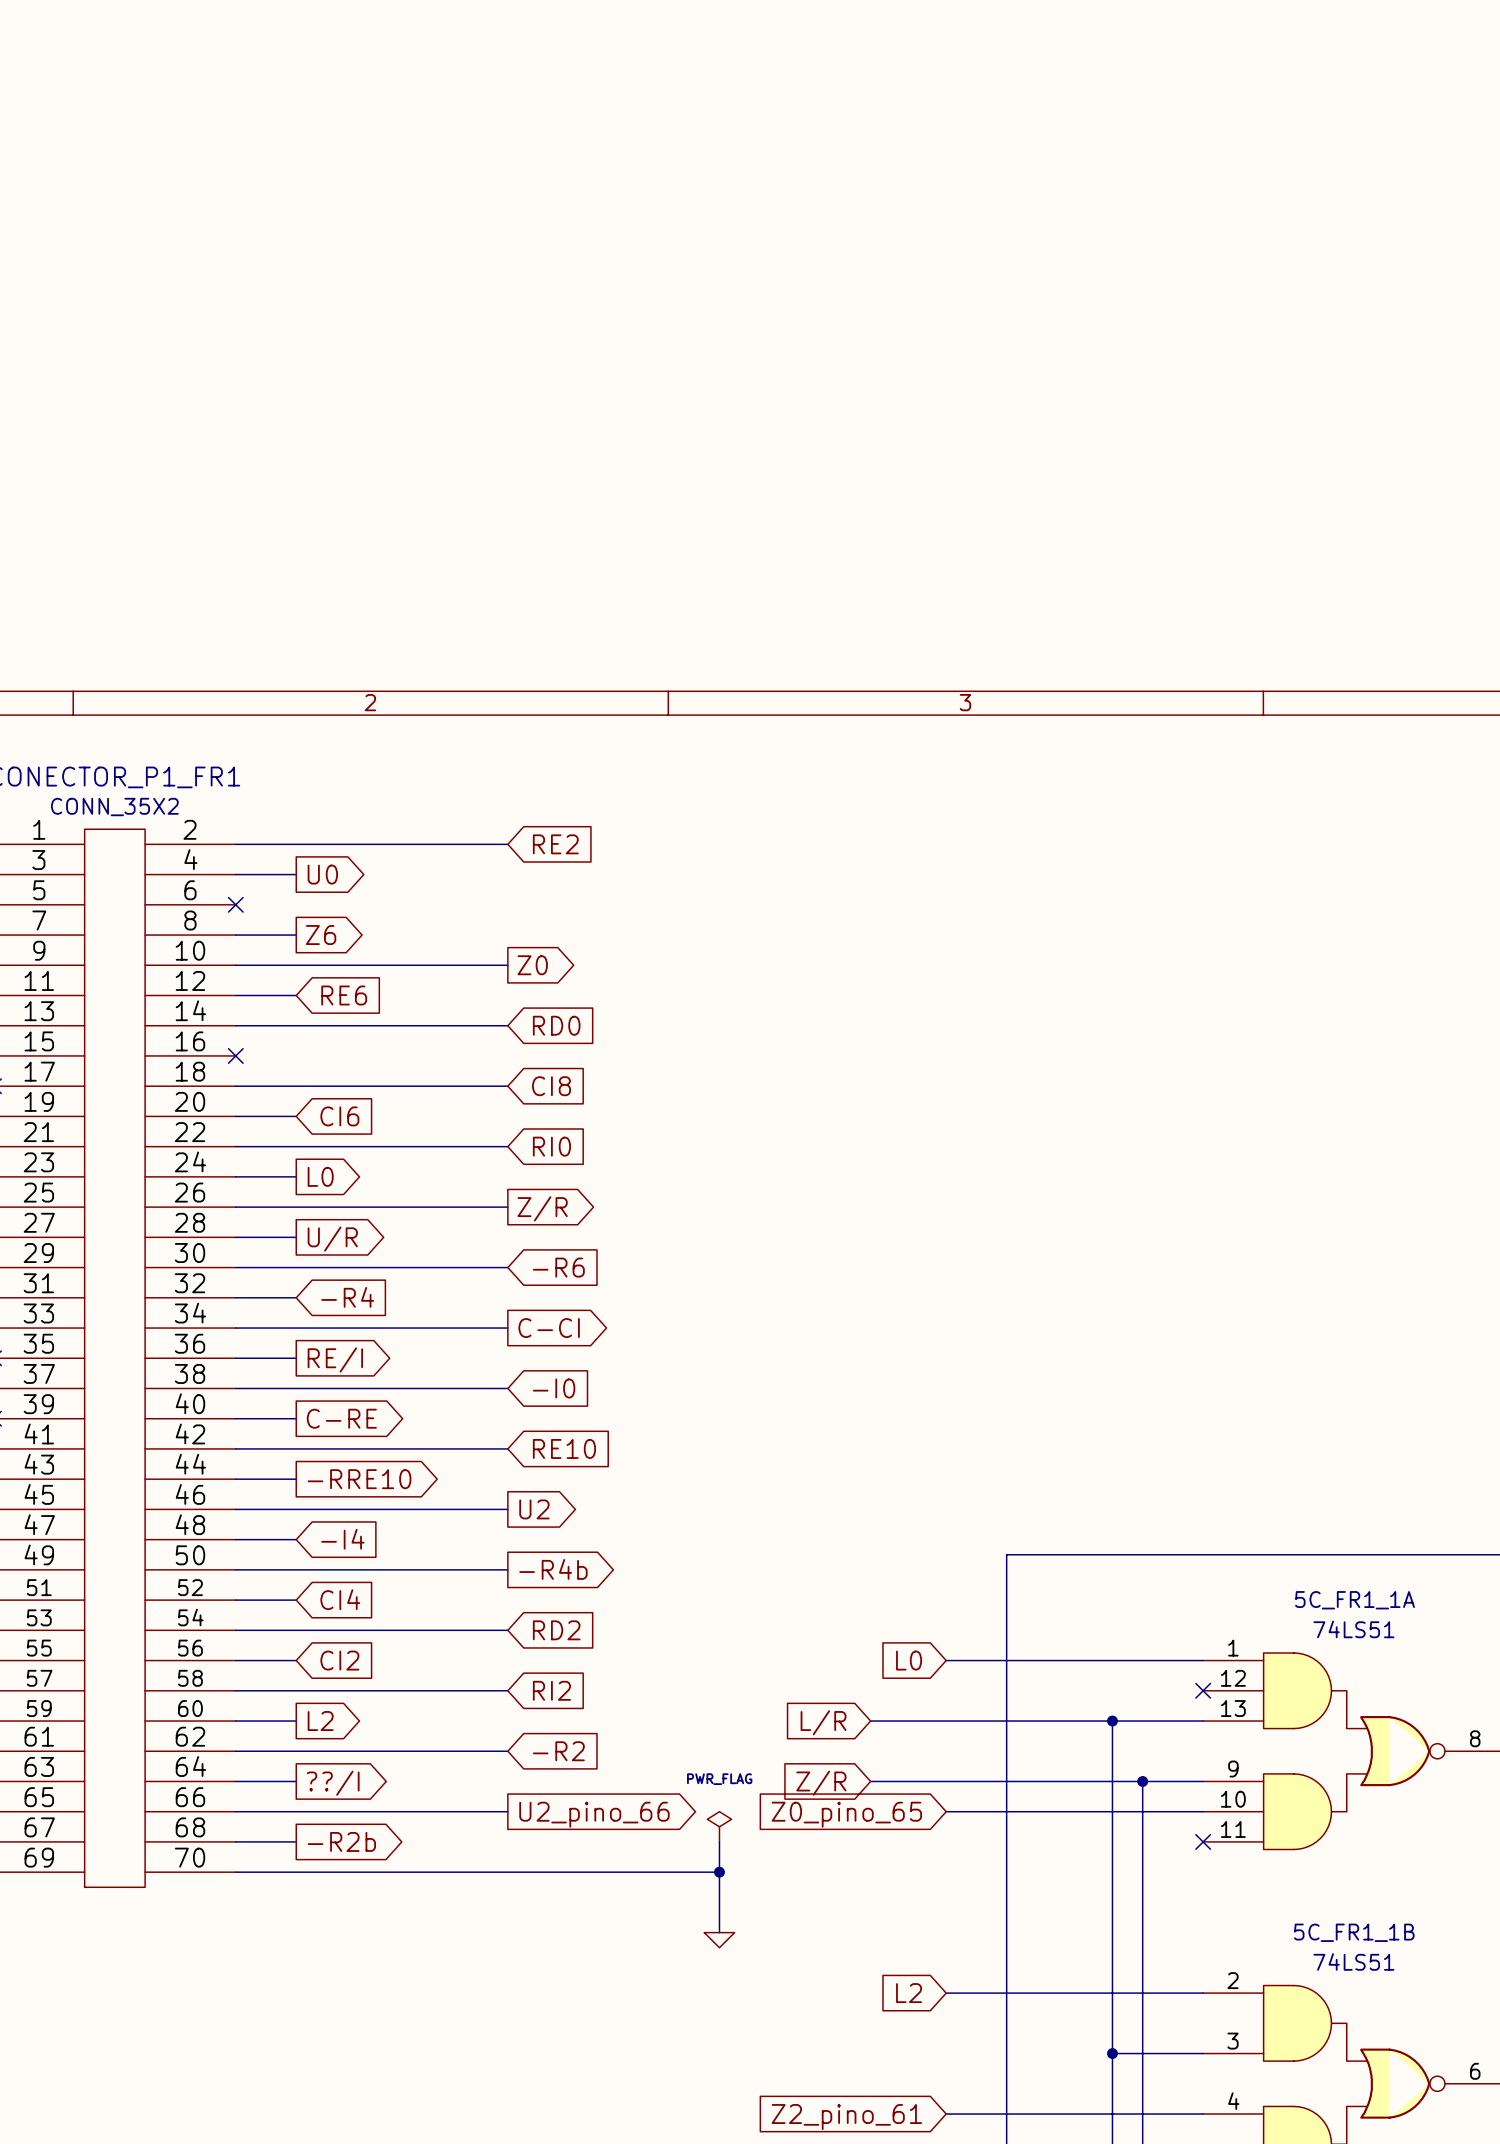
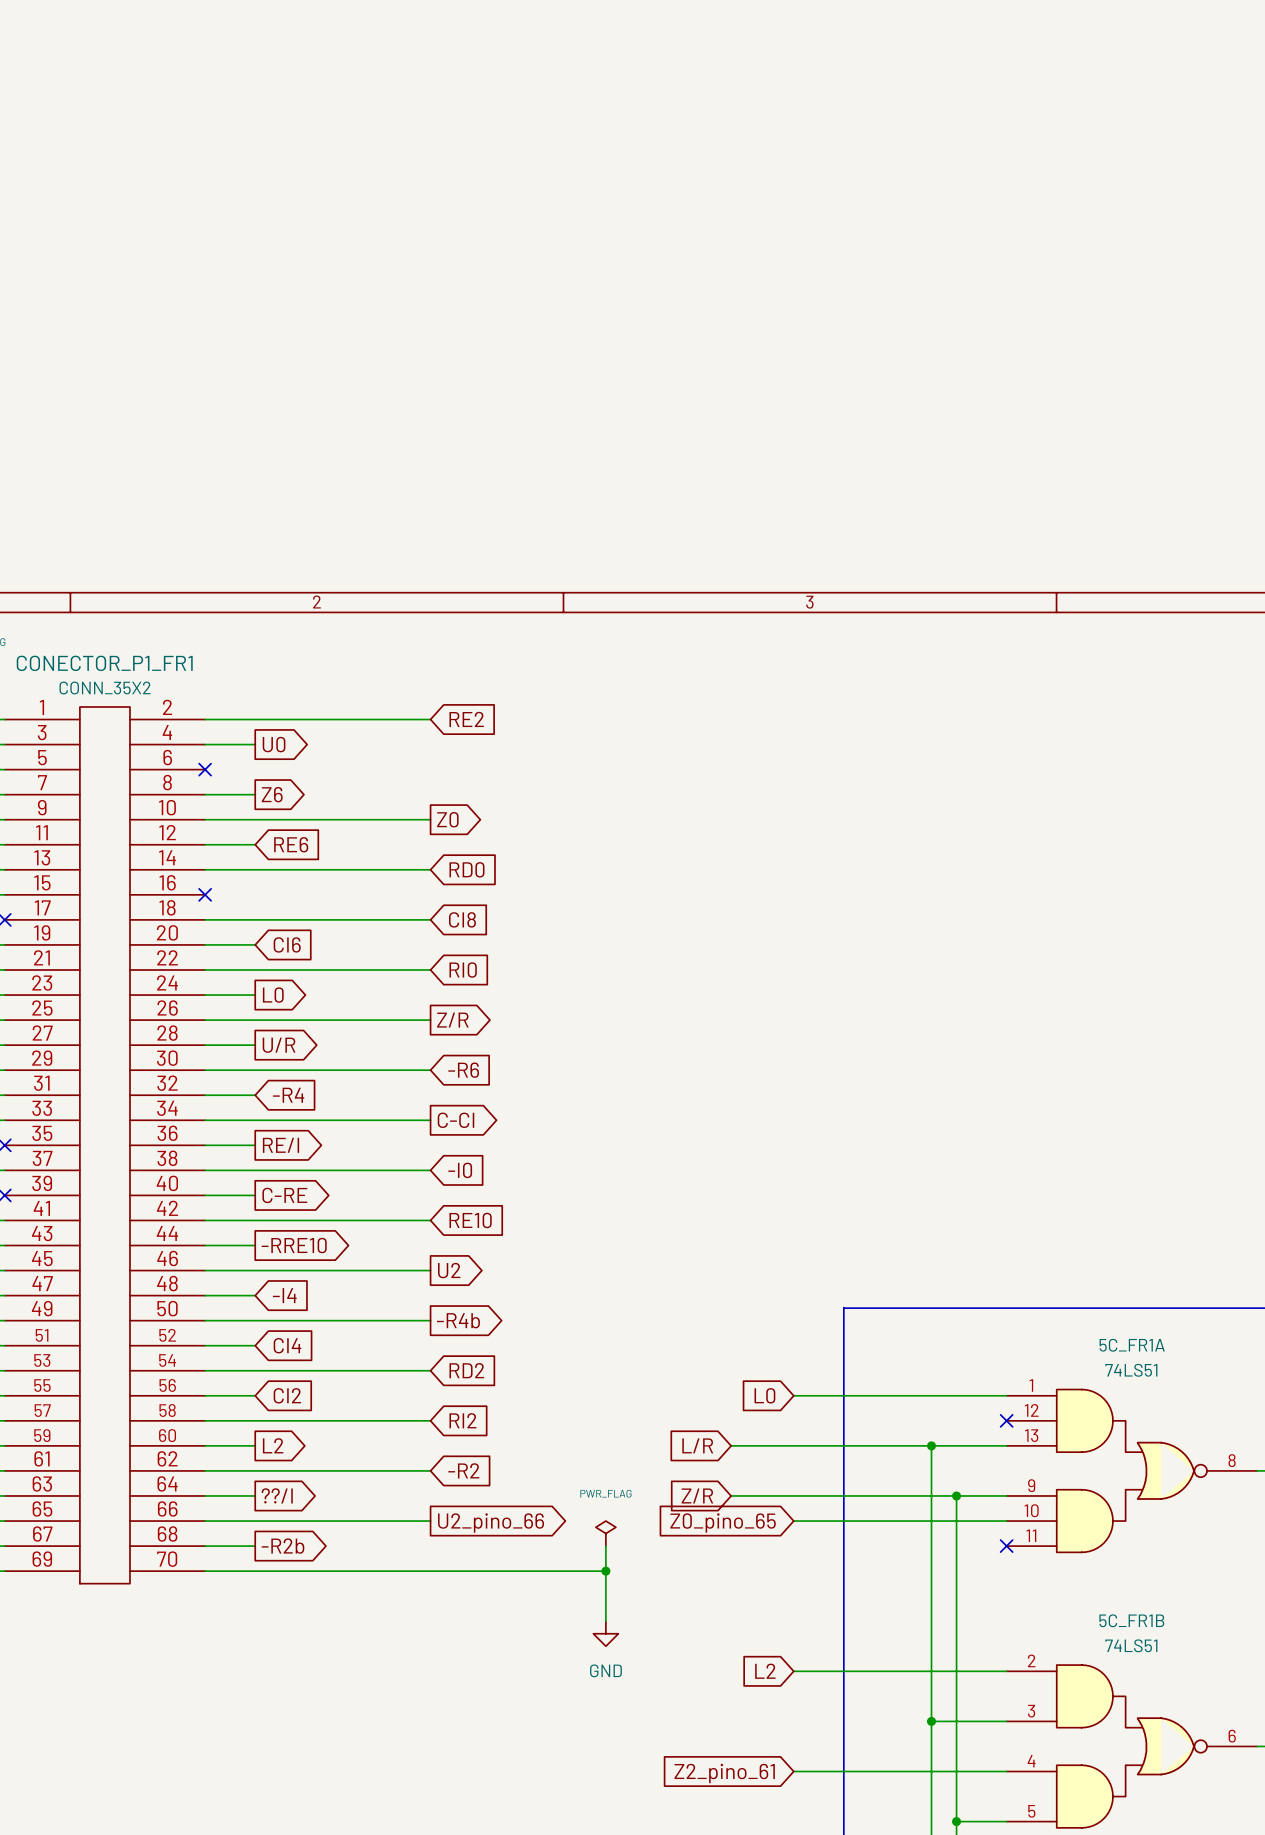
5C_FR1_1A name: 5C_FR1_1A (1355, 1600) -> 5C_FR1A (1132, 1345)
power symbol shape: [704, 1932, 735, 1948] -> [593, 1621, 619, 1647]
5C_FR1_1B name: 5C_FR1_1B (1354, 1932) -> 5C_FR1B (1131, 1620)
power symbol text: none -> GND (605, 1670)

